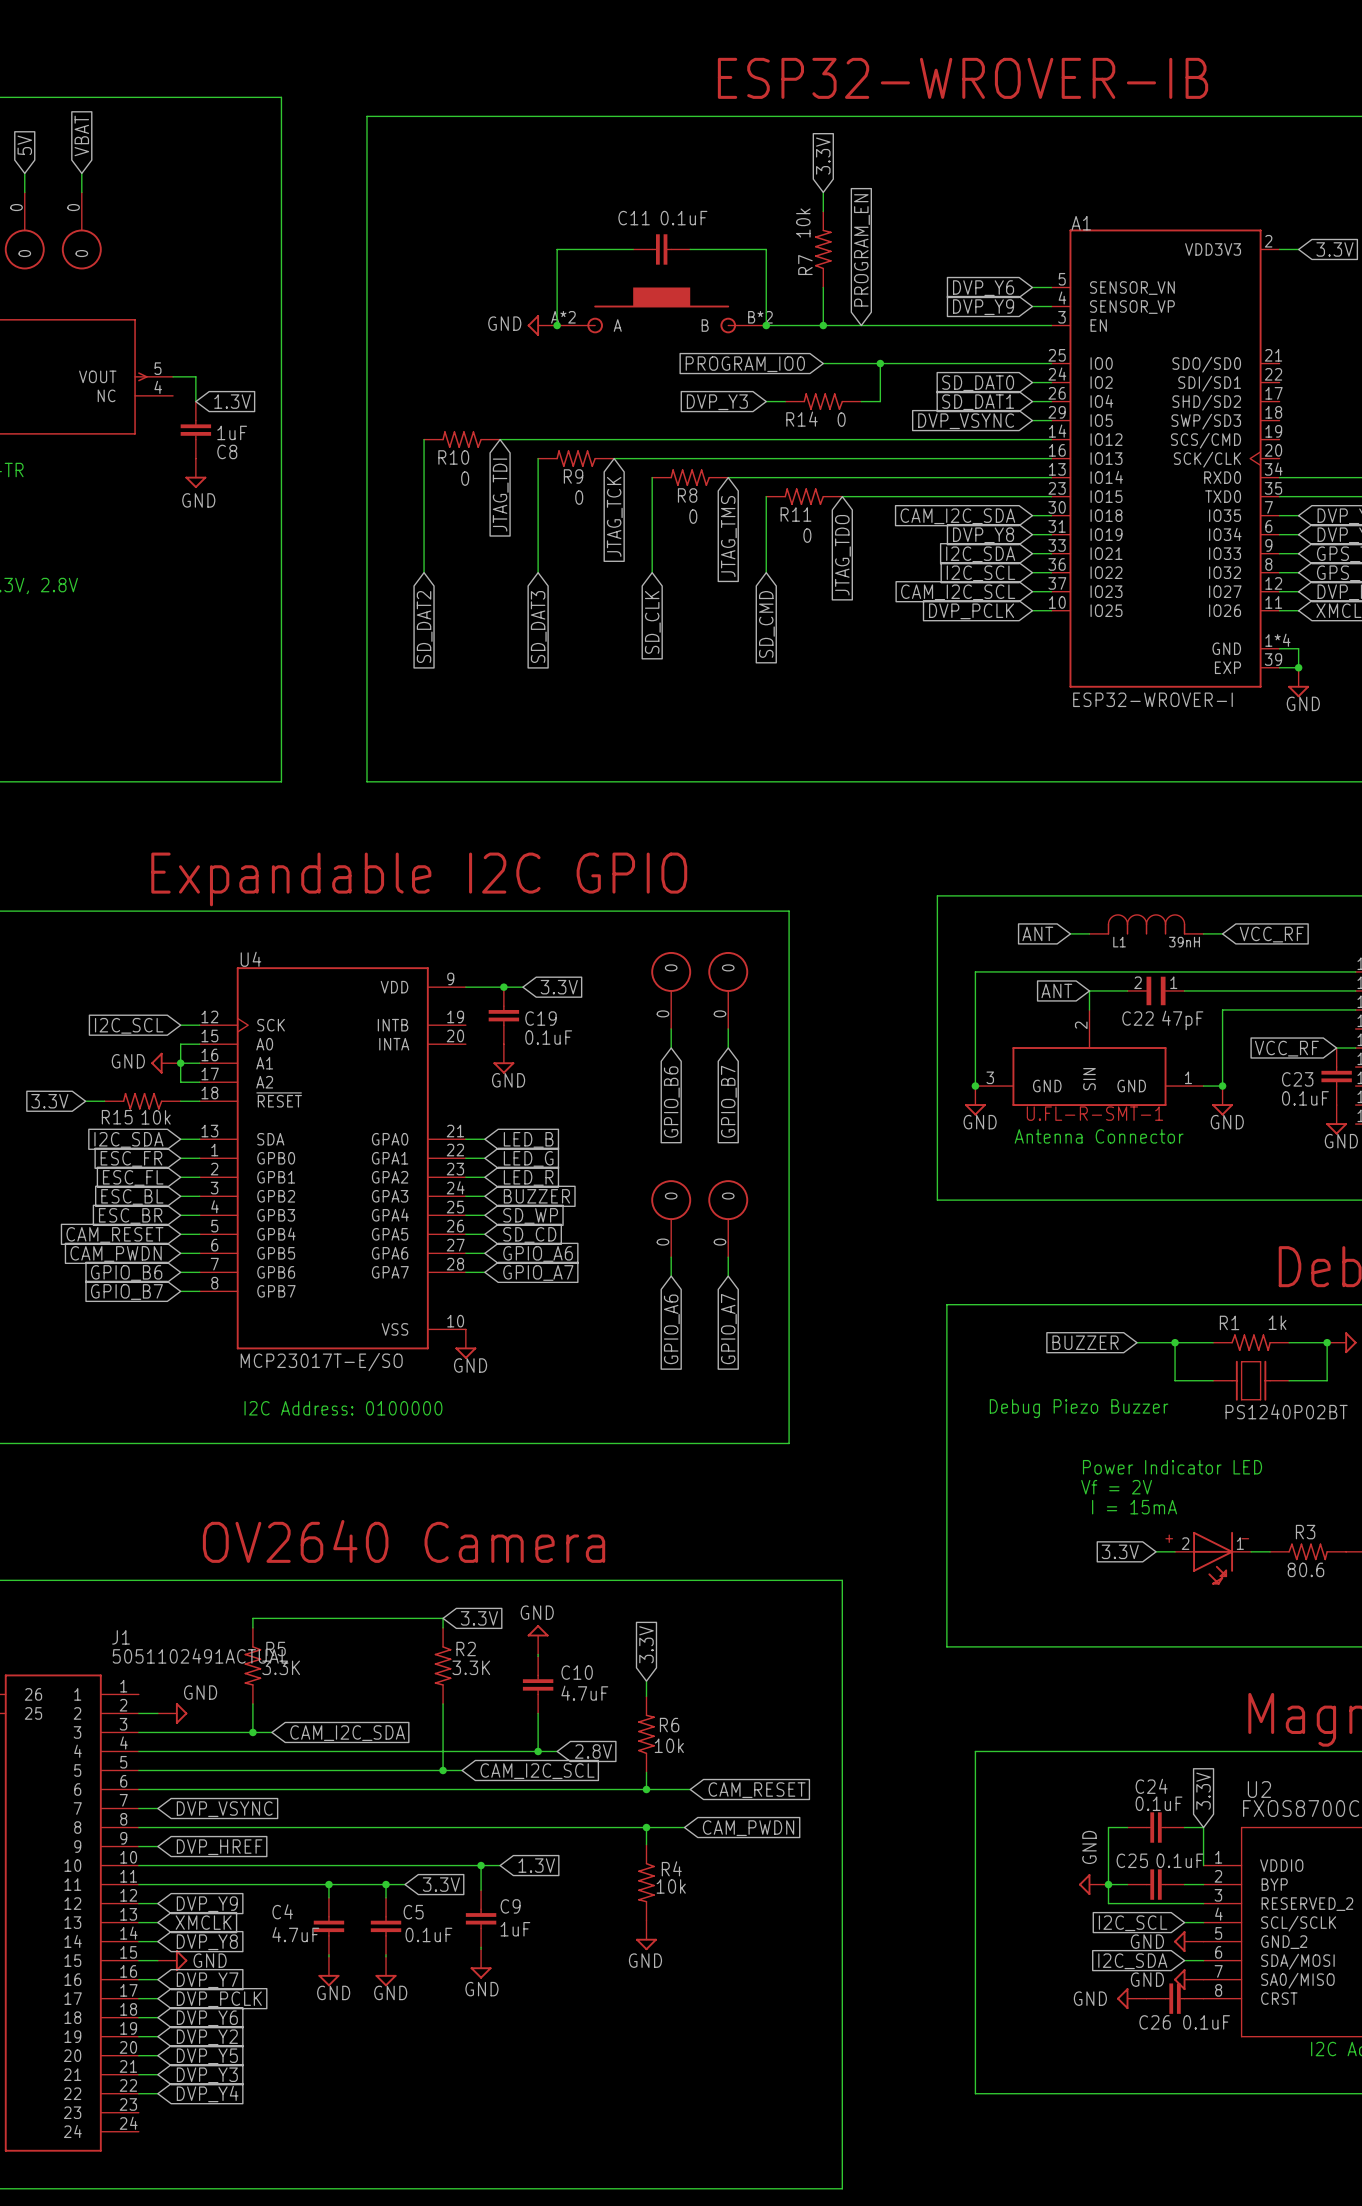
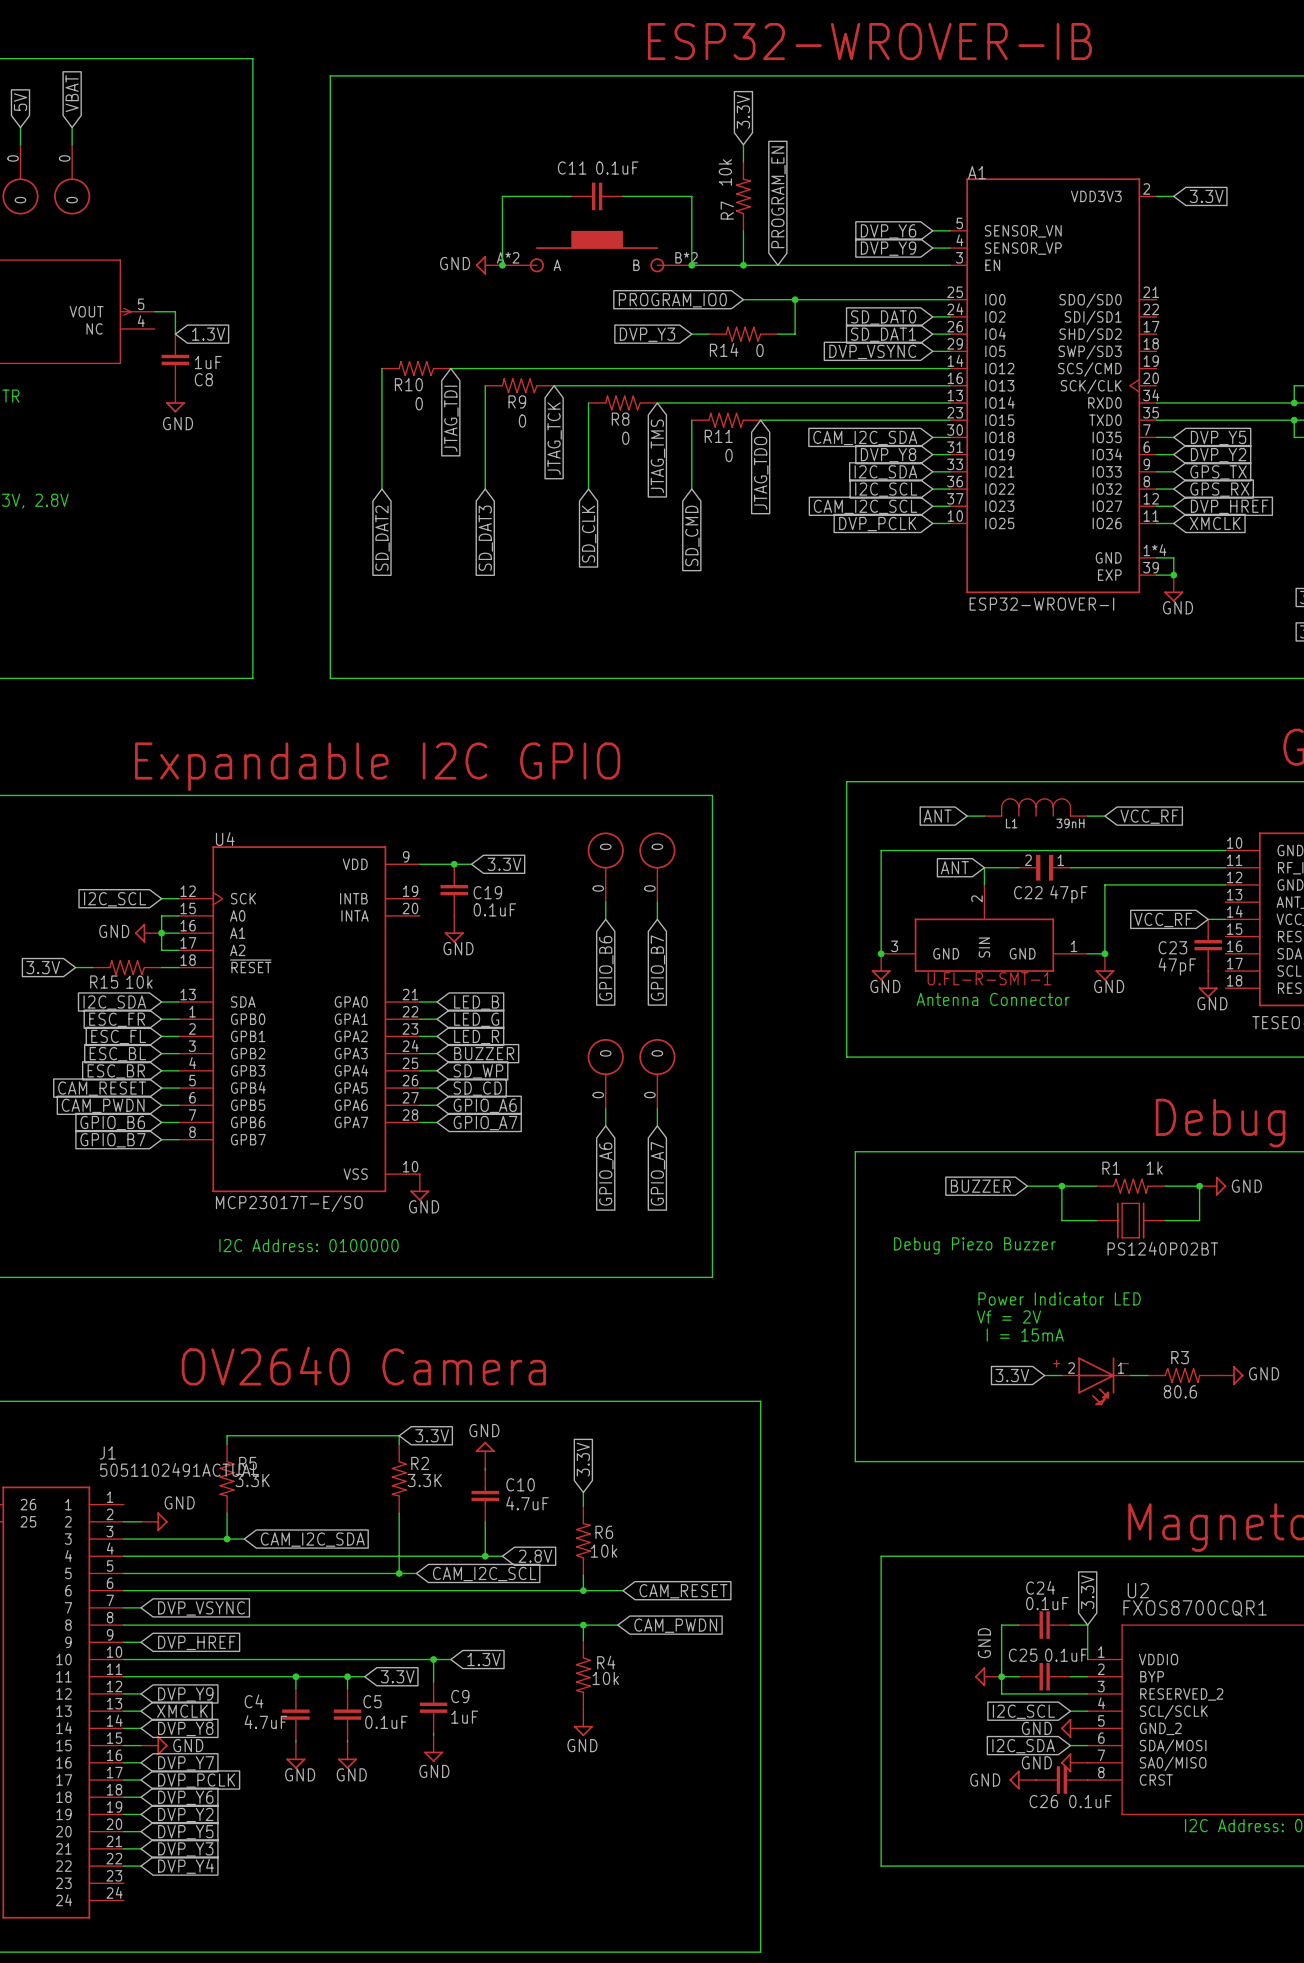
C23 value: 0.1uF (1305, 1098) -> 47pF (1177, 966)

